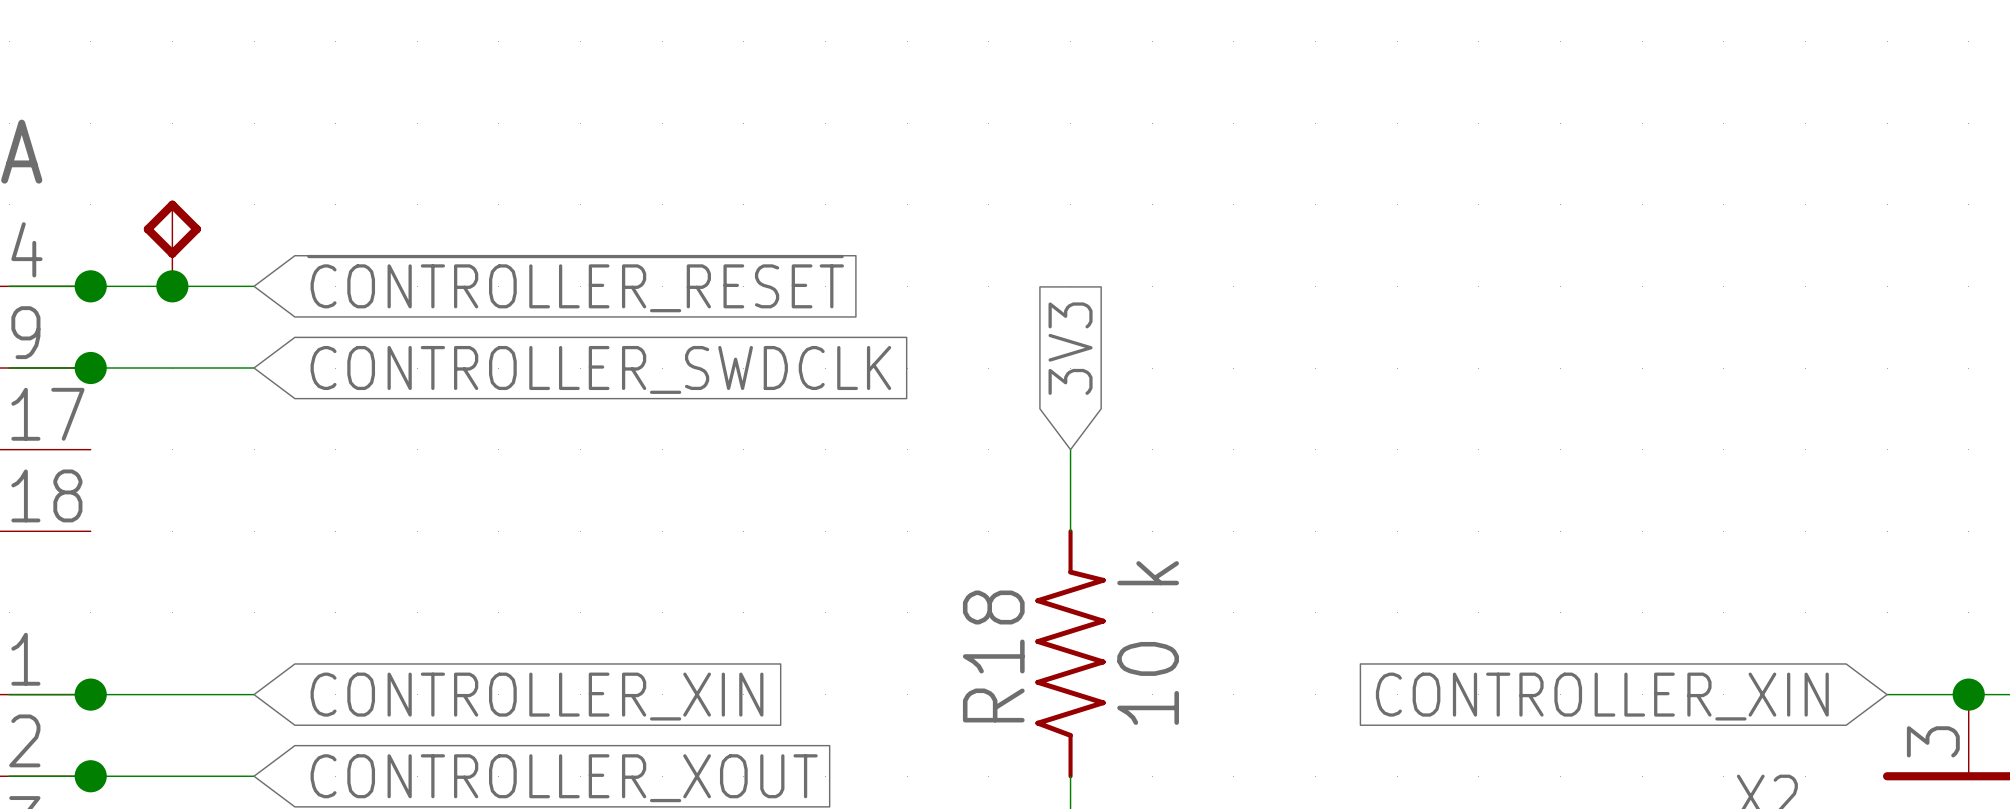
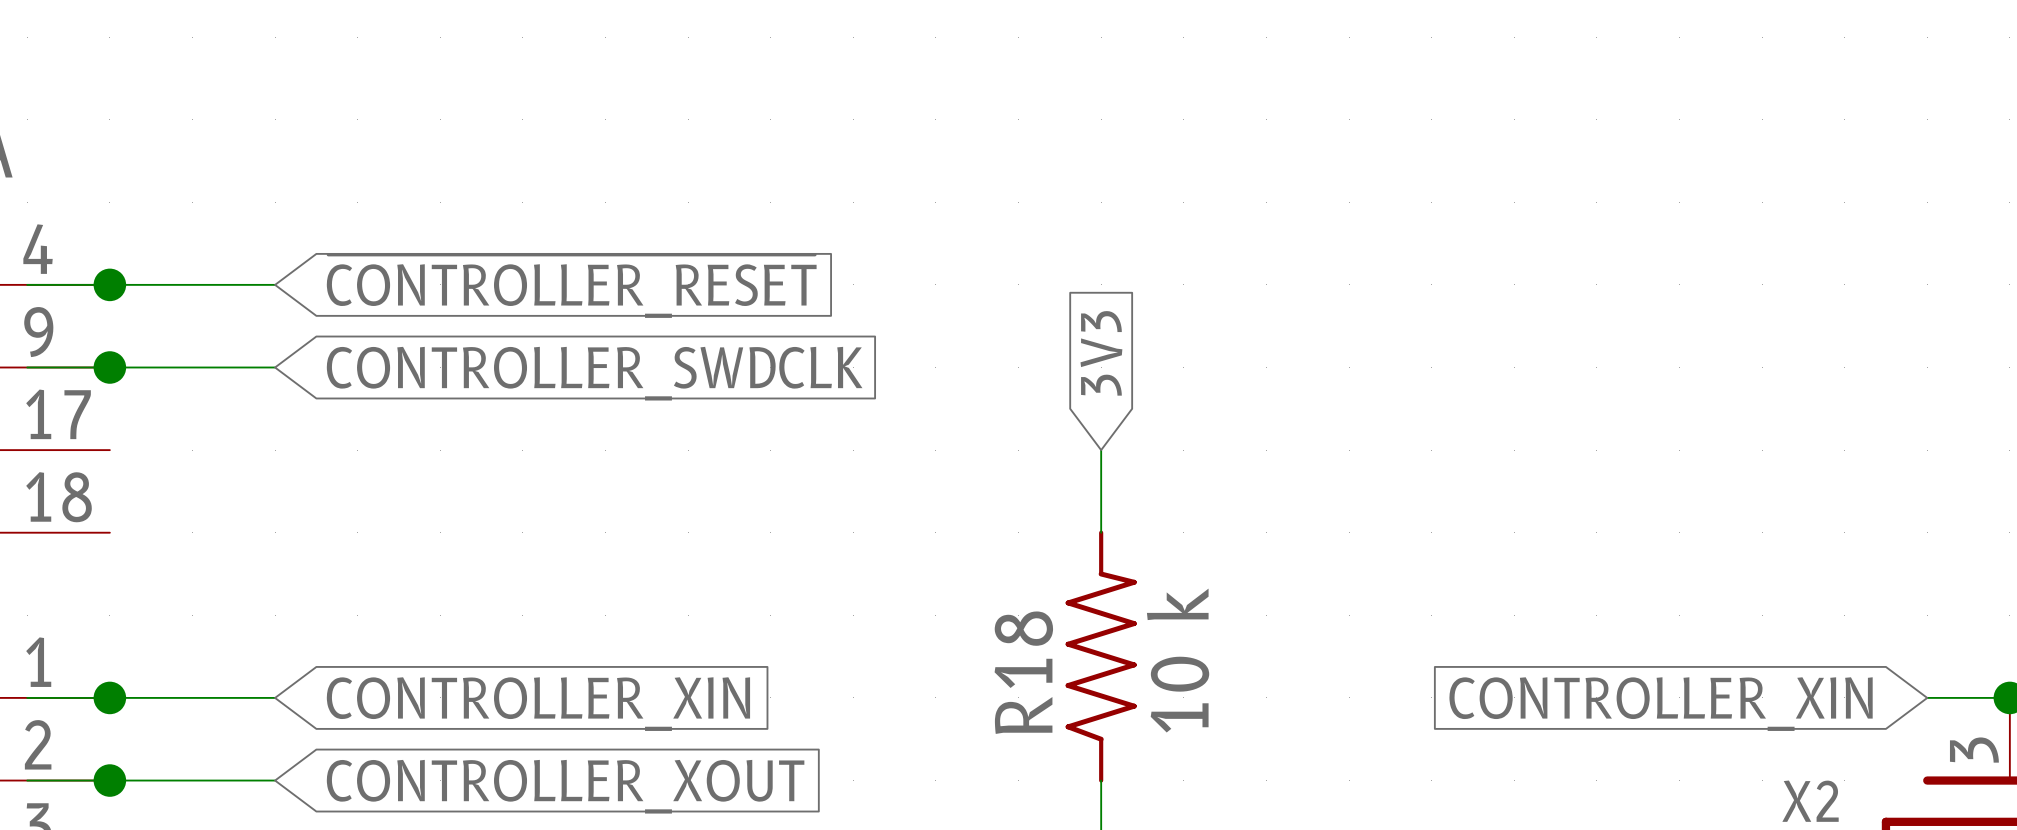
part: (172, 243) -> none
junction: (172, 286) -> none

